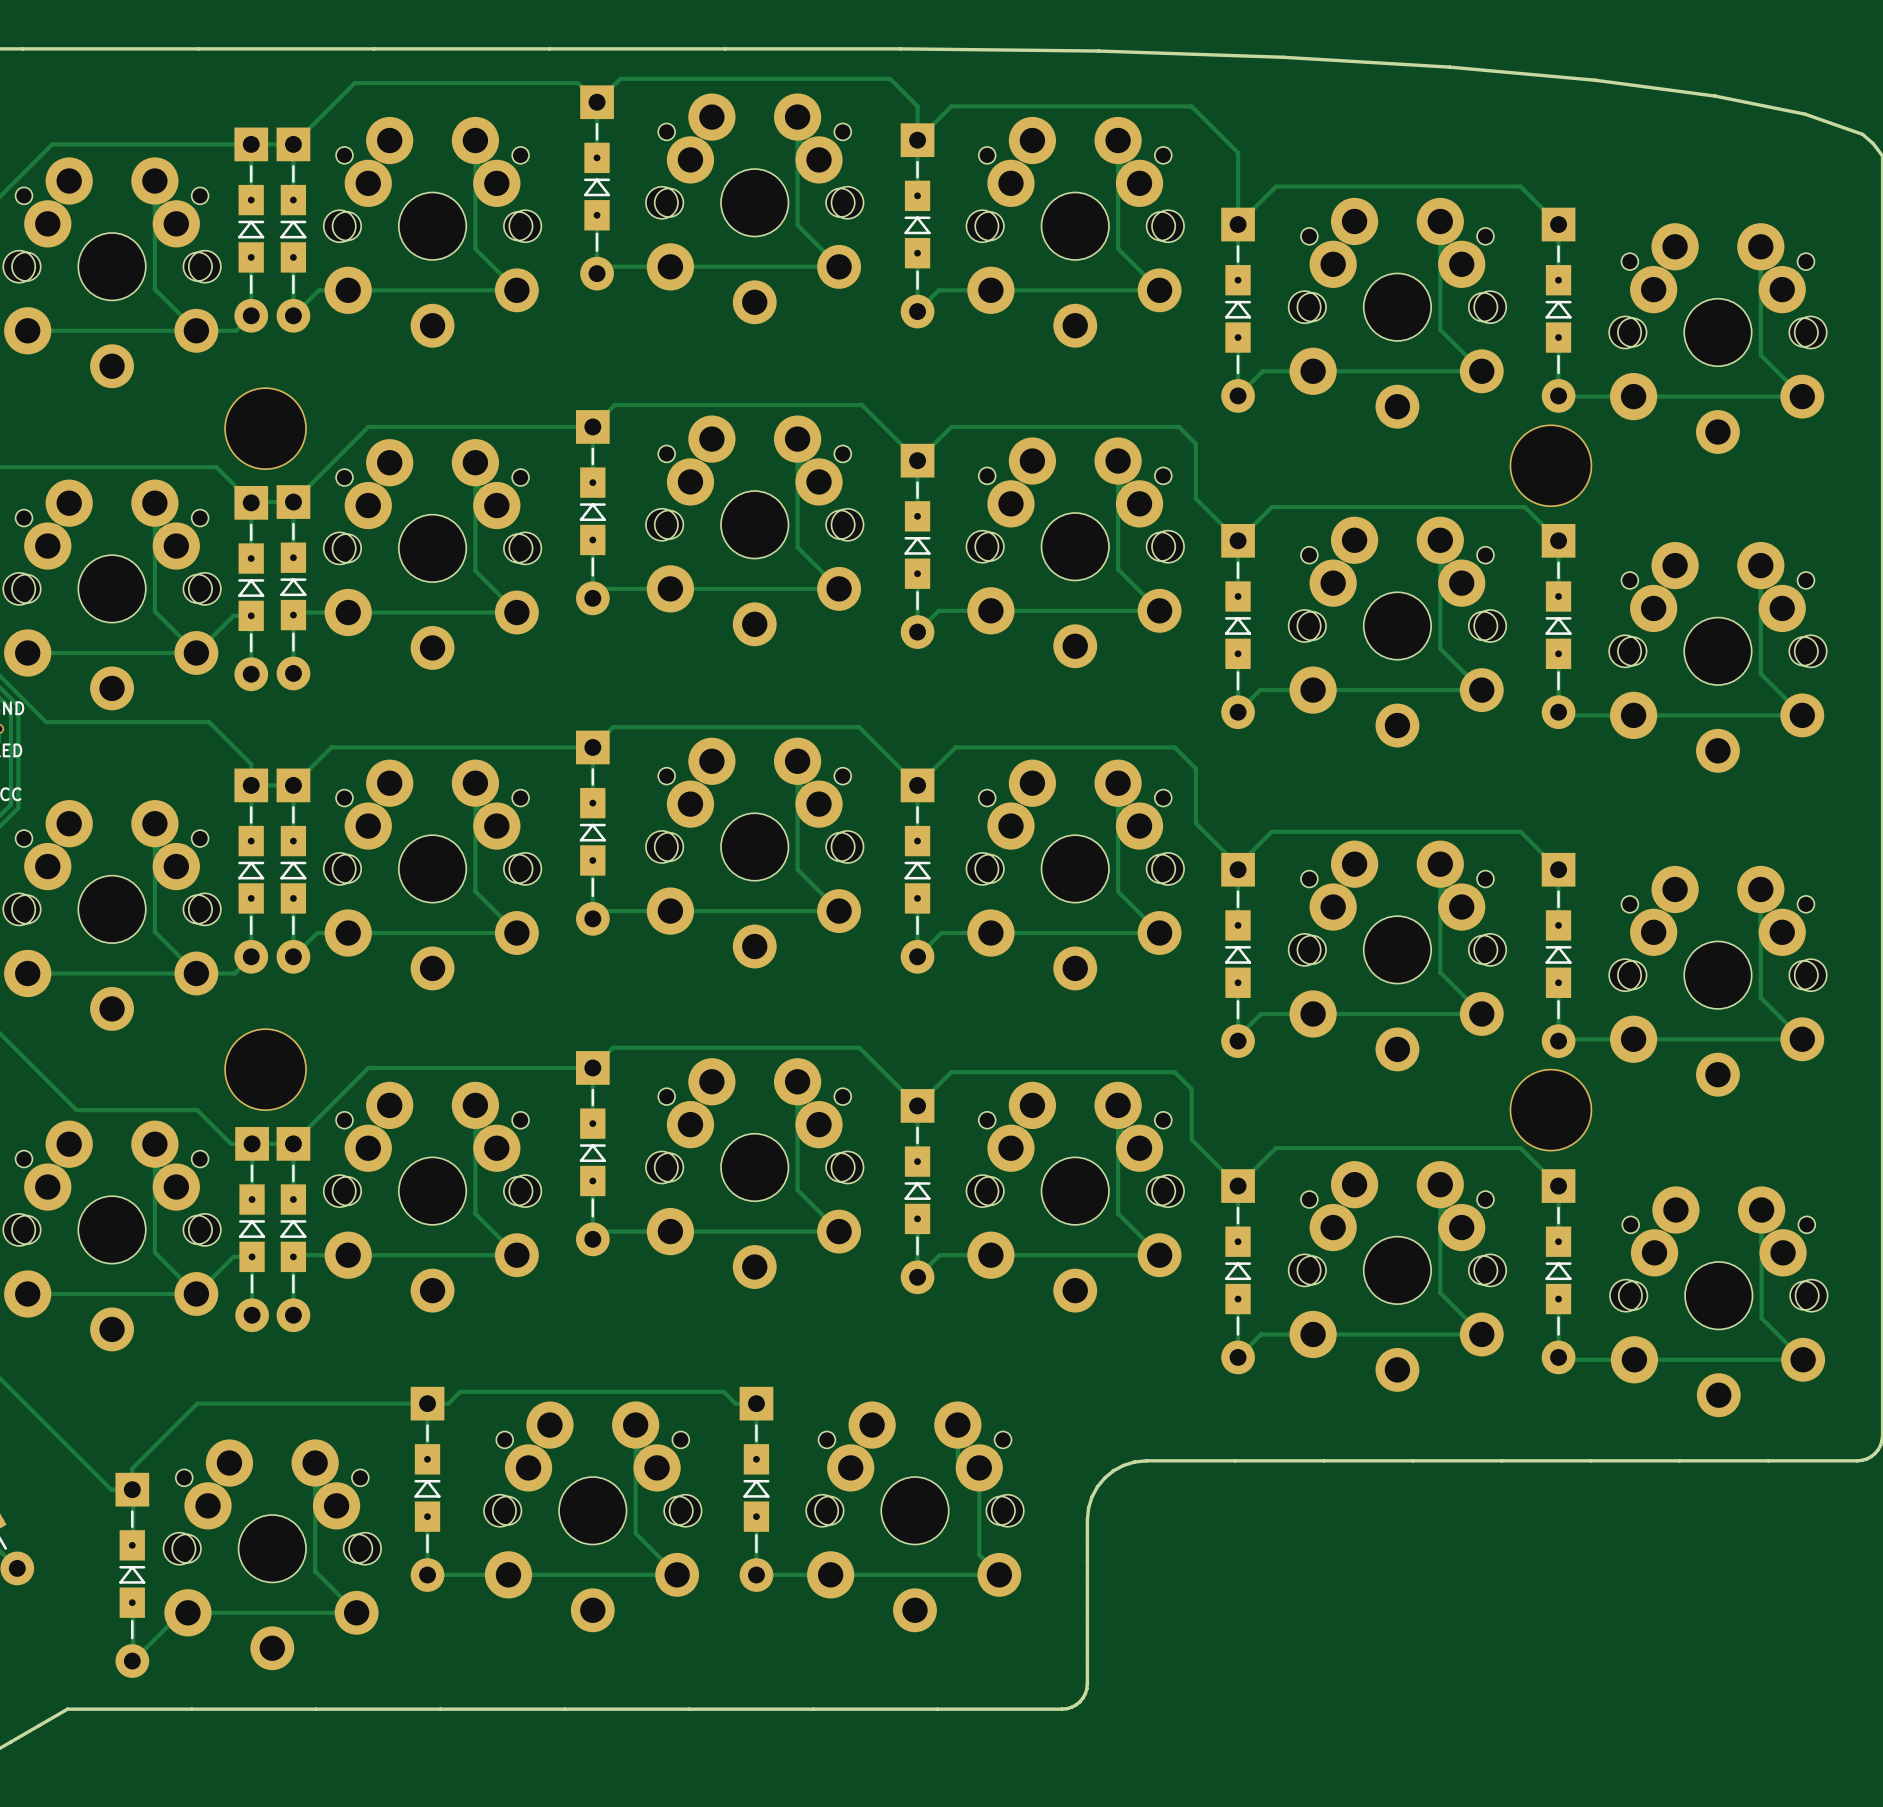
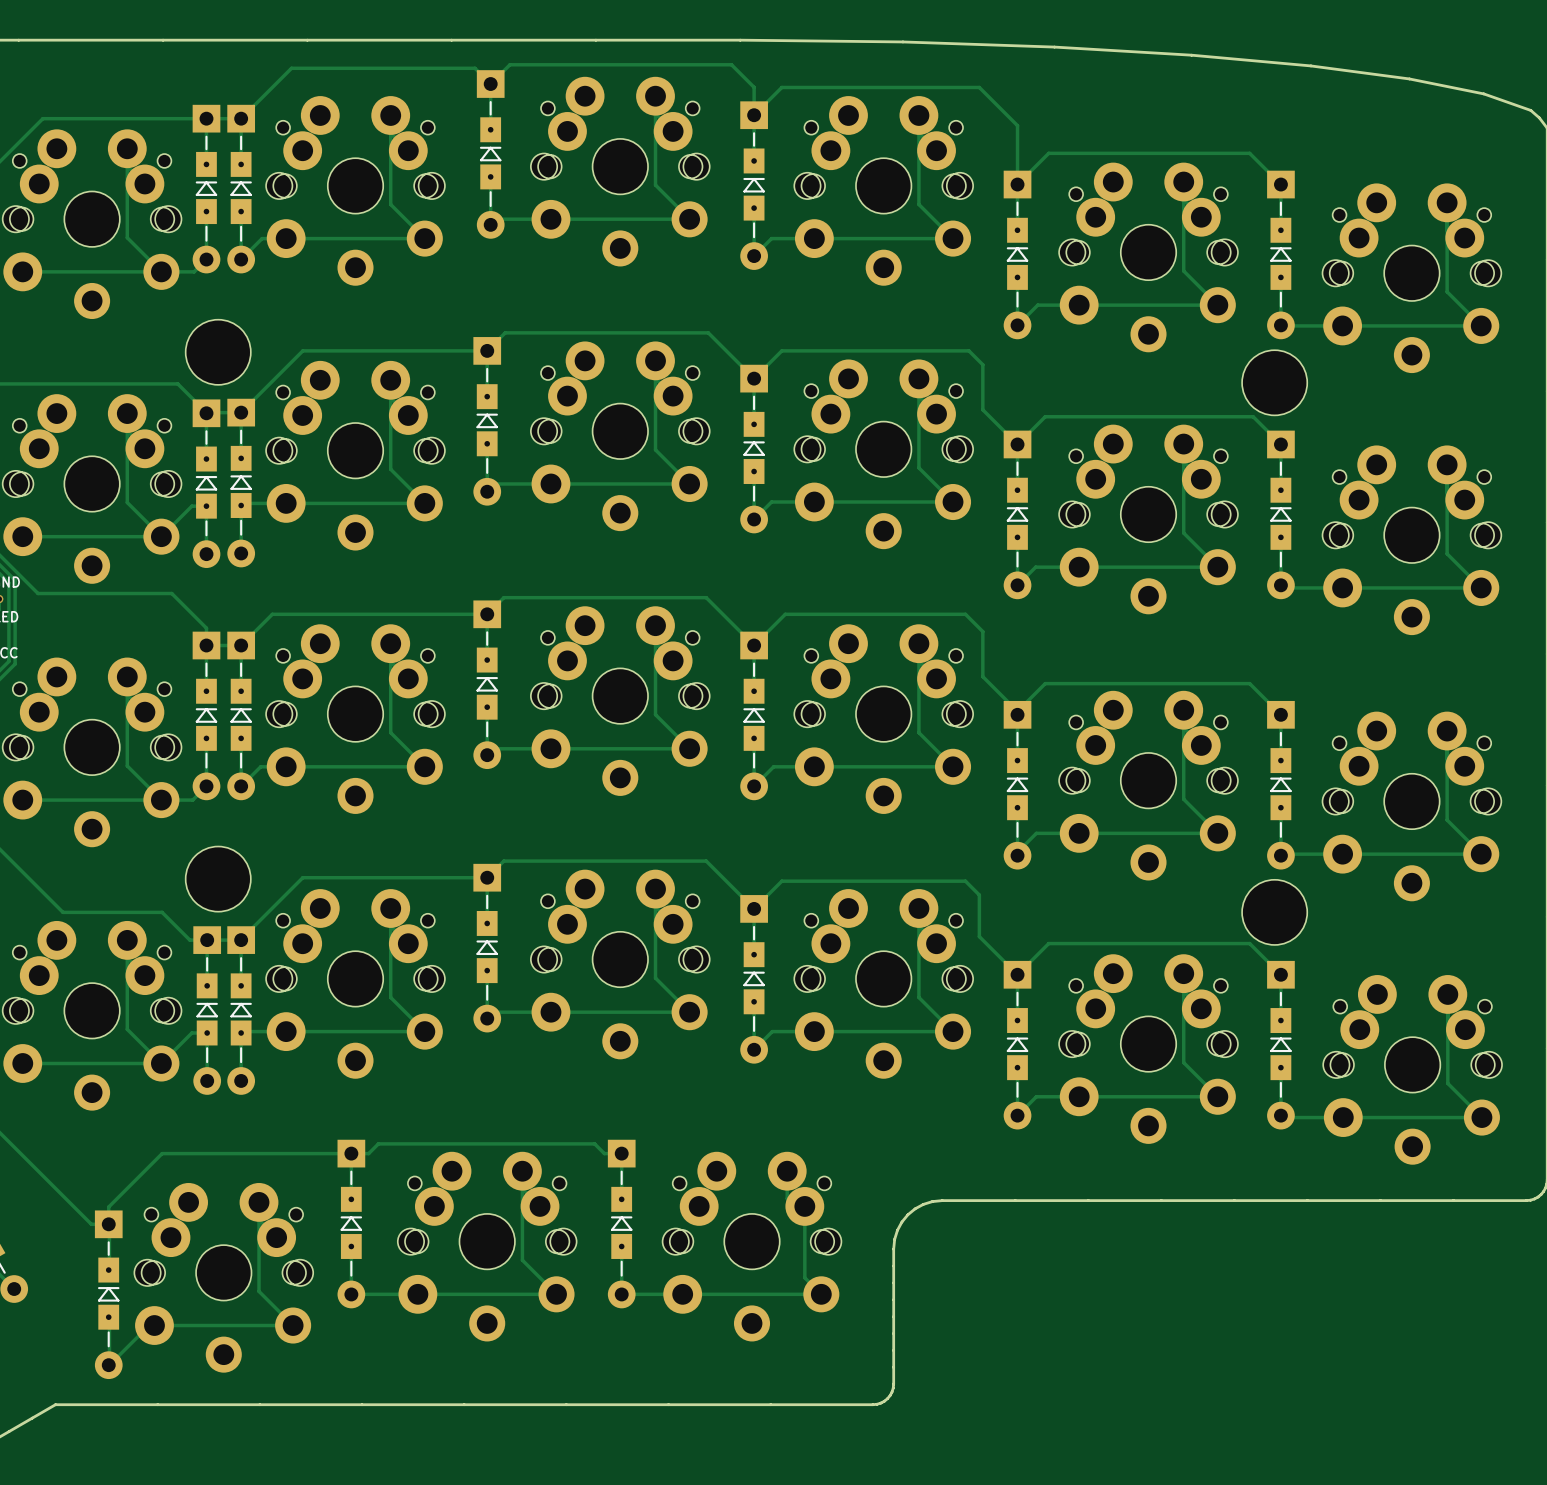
part footprint: [224, 387, 307, 470] -> [185, 319, 251, 385]
part footprint: [1509, 424, 1593, 508] -> [1242, 350, 1308, 416]
part footprint: [224, 1028, 307, 1111] -> [185, 846, 251, 912]
part footprint: [1509, 1068, 1593, 1152] -> [1242, 879, 1308, 945]

